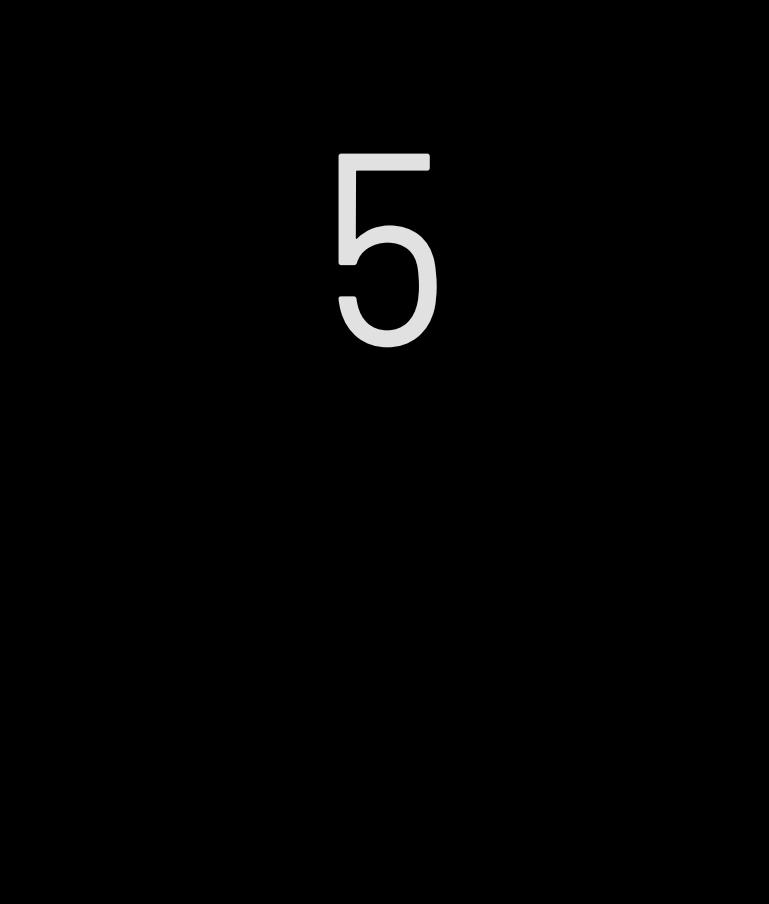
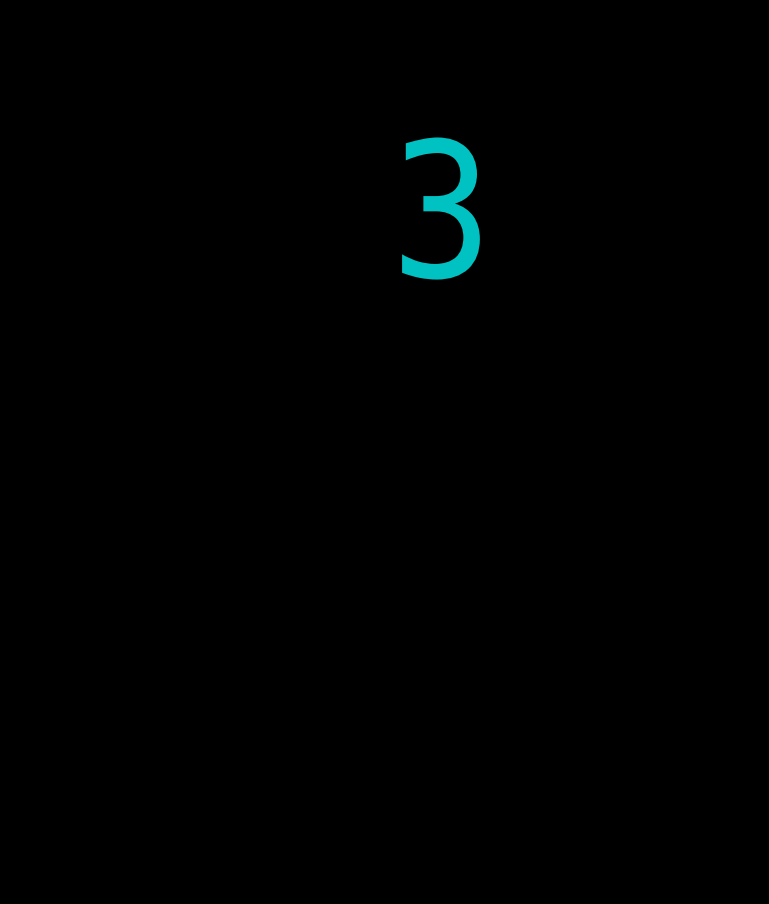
text: 5 (387, 250) -> 3 (440, 208)

